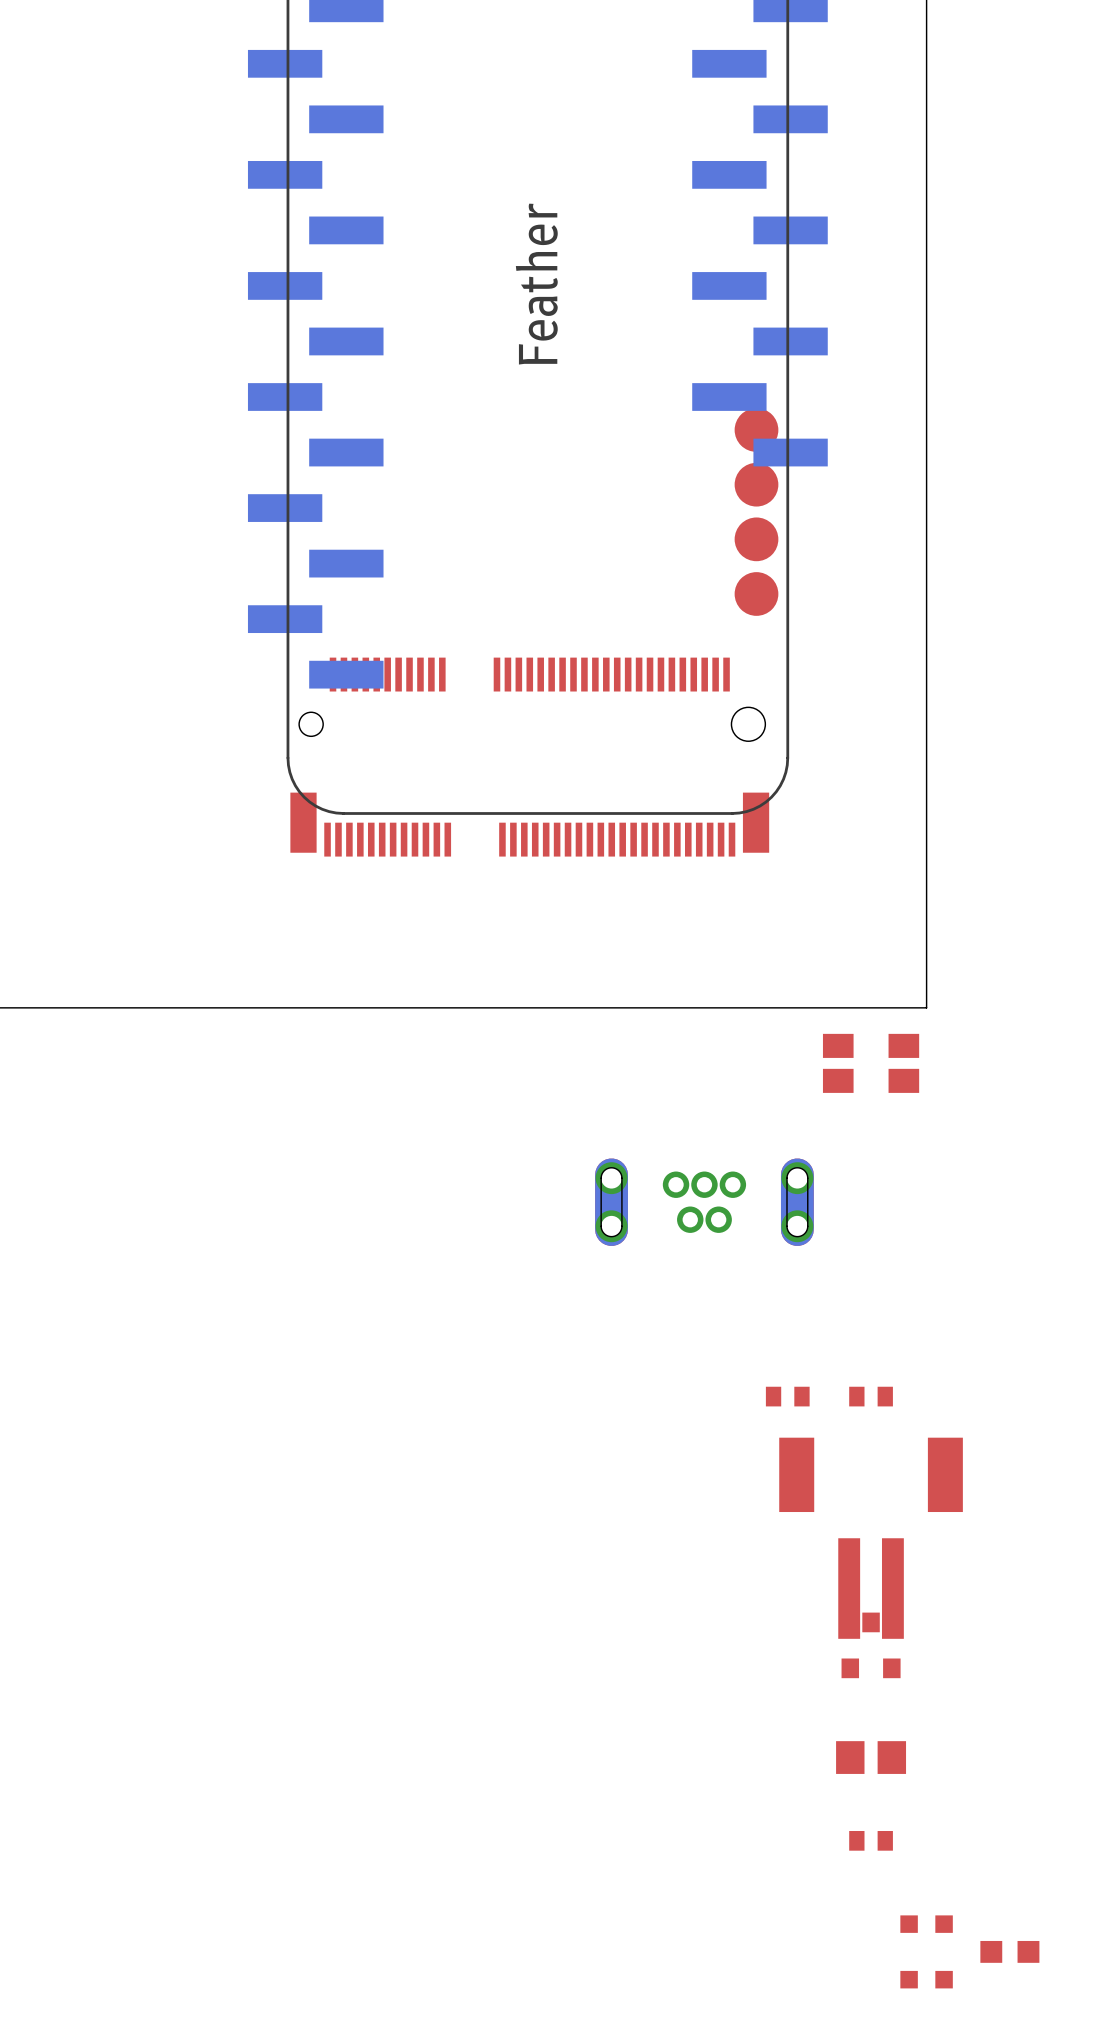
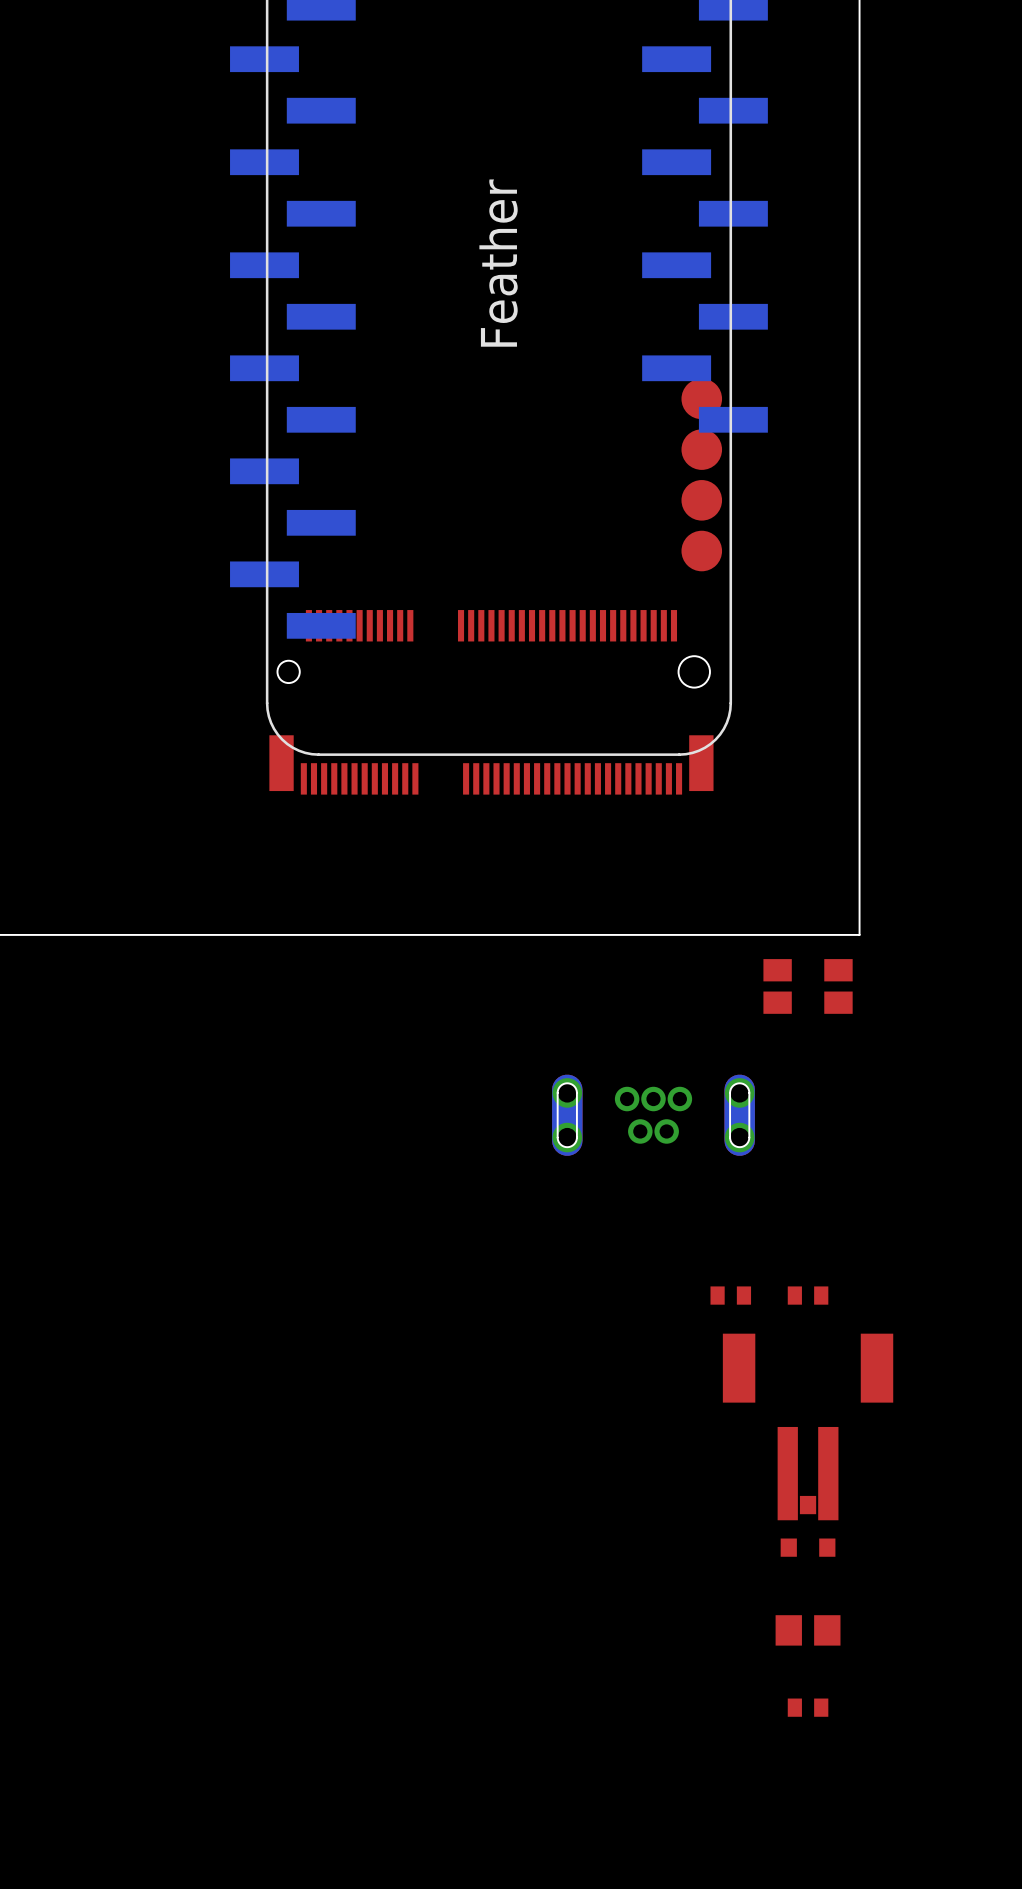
part: (926, 1924) -> none
part: (1009, 1951) -> none
part: (926, 1979) -> none

